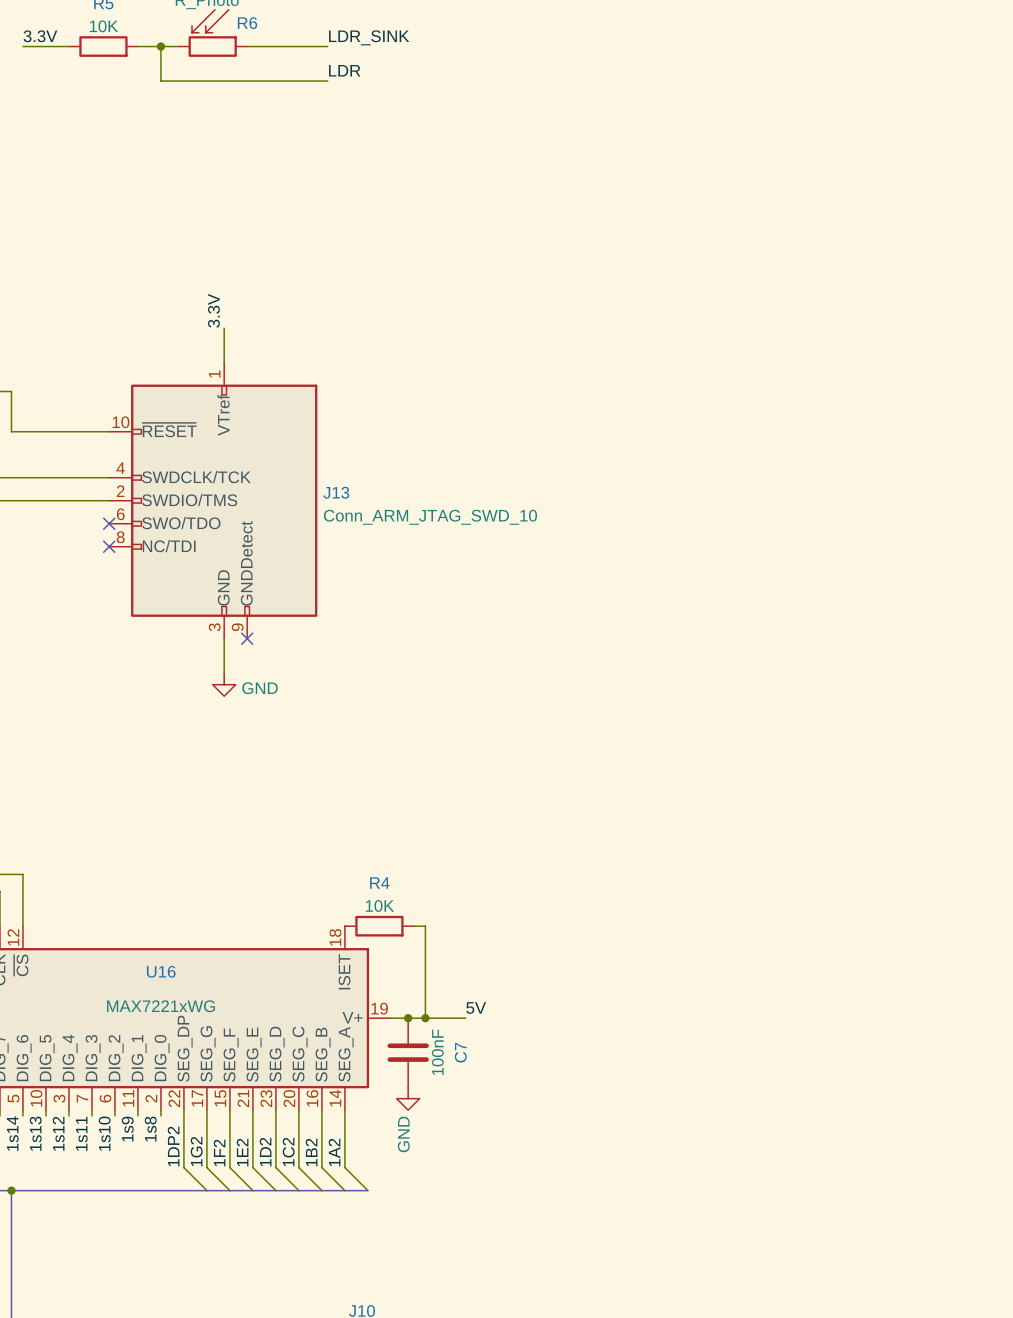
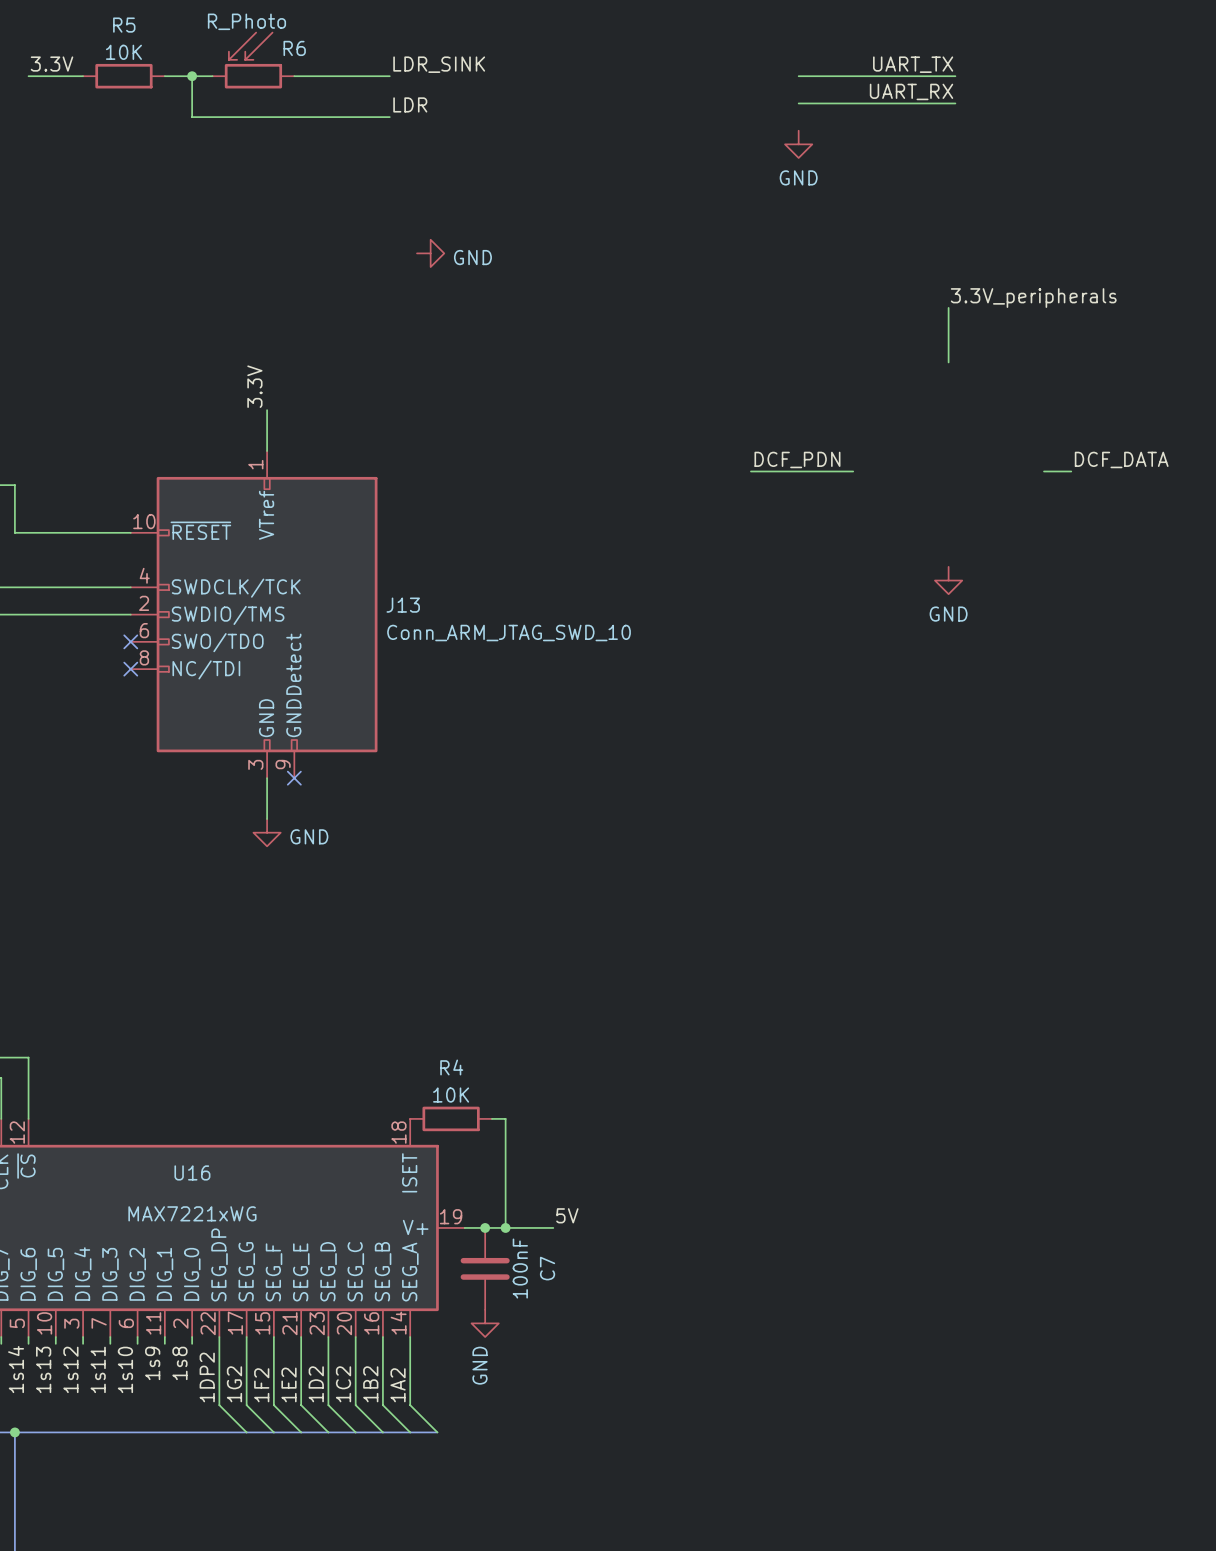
label: none -> UART_TX (913, 64)
wire: none -> (798, 76) (955, 76)
label: none -> UART_RX (911, 91)
wire: none -> (798, 103) (955, 103)
power symbol: none -> GND (798, 144)
power symbol: none -> GND (430, 253)
label: none -> 3.3V_peripherals (1033, 298)
wire: none -> (948, 307) (948, 362)
label: none -> DCF_PDN (797, 459)
label: none -> DCF_DATA (1121, 459)
wire: none -> (750, 471) (853, 471)
wire: none -> (1044, 471) (1071, 471)
power symbol: none -> GND (948, 580)

